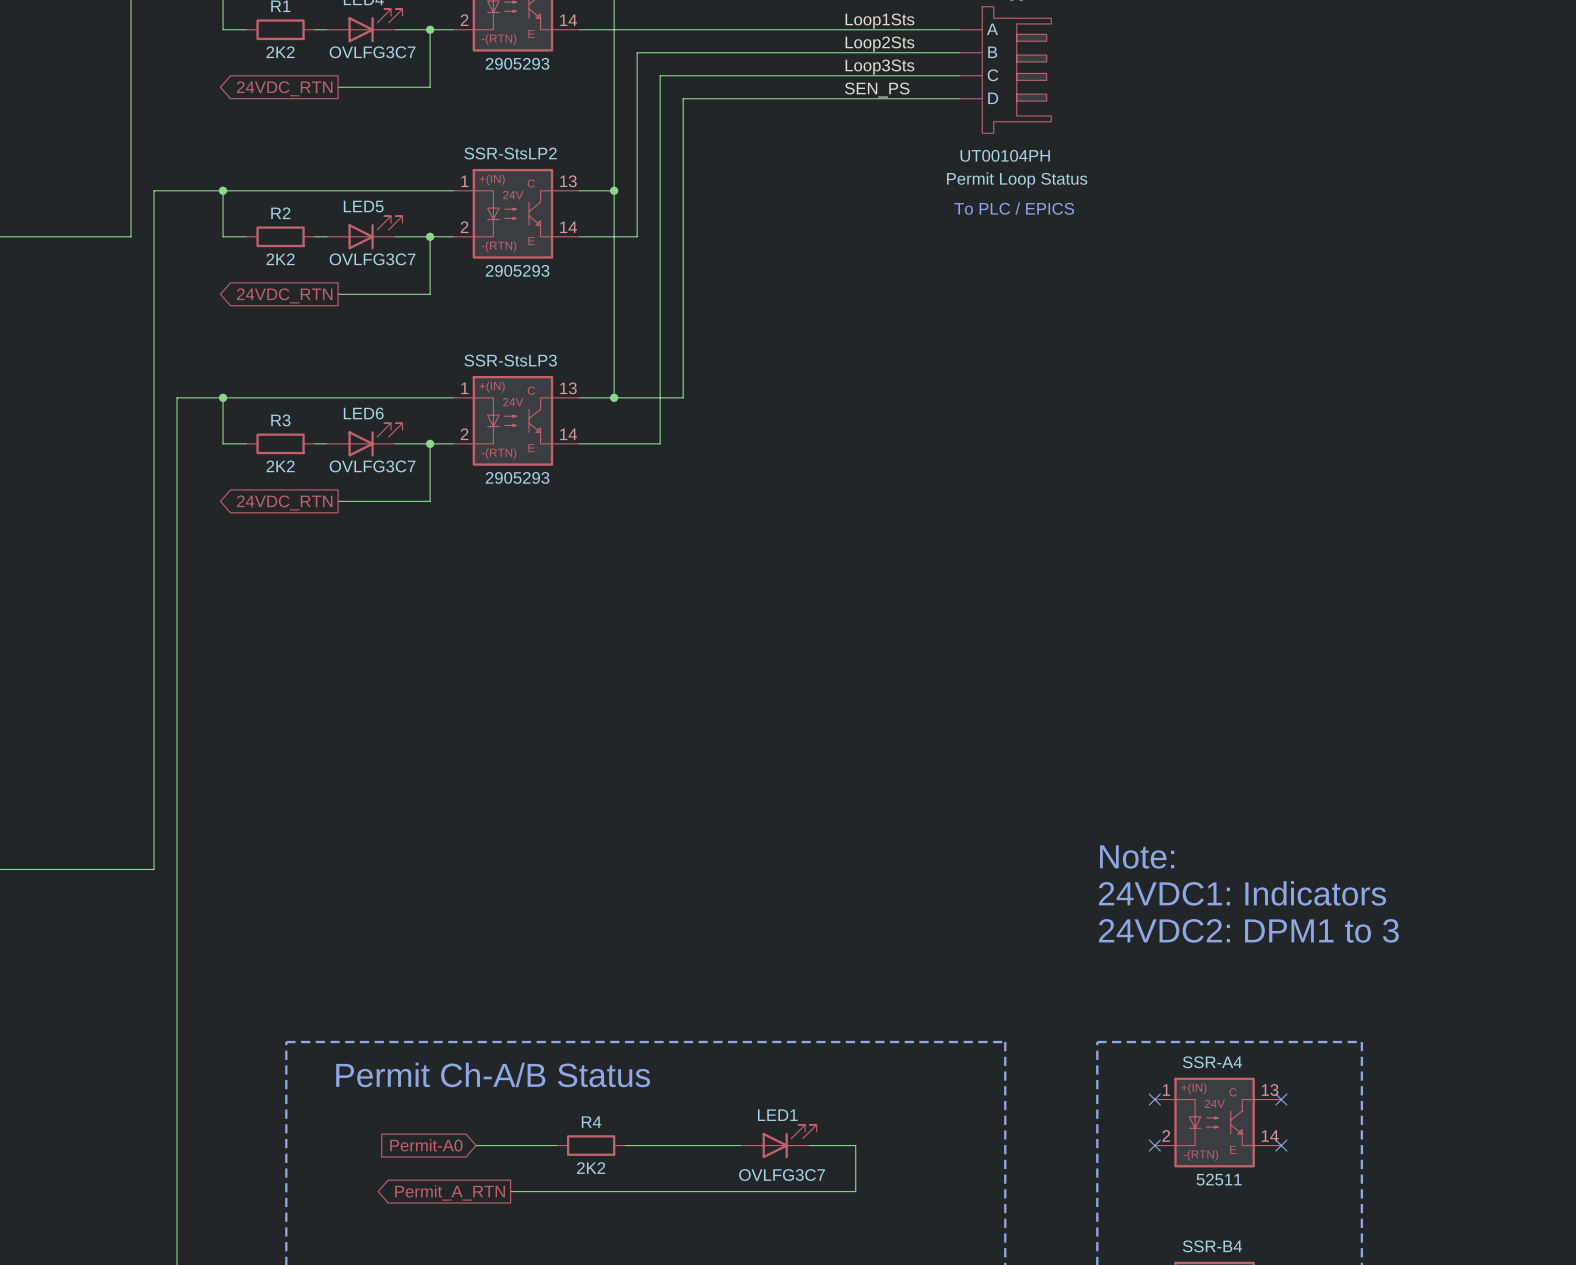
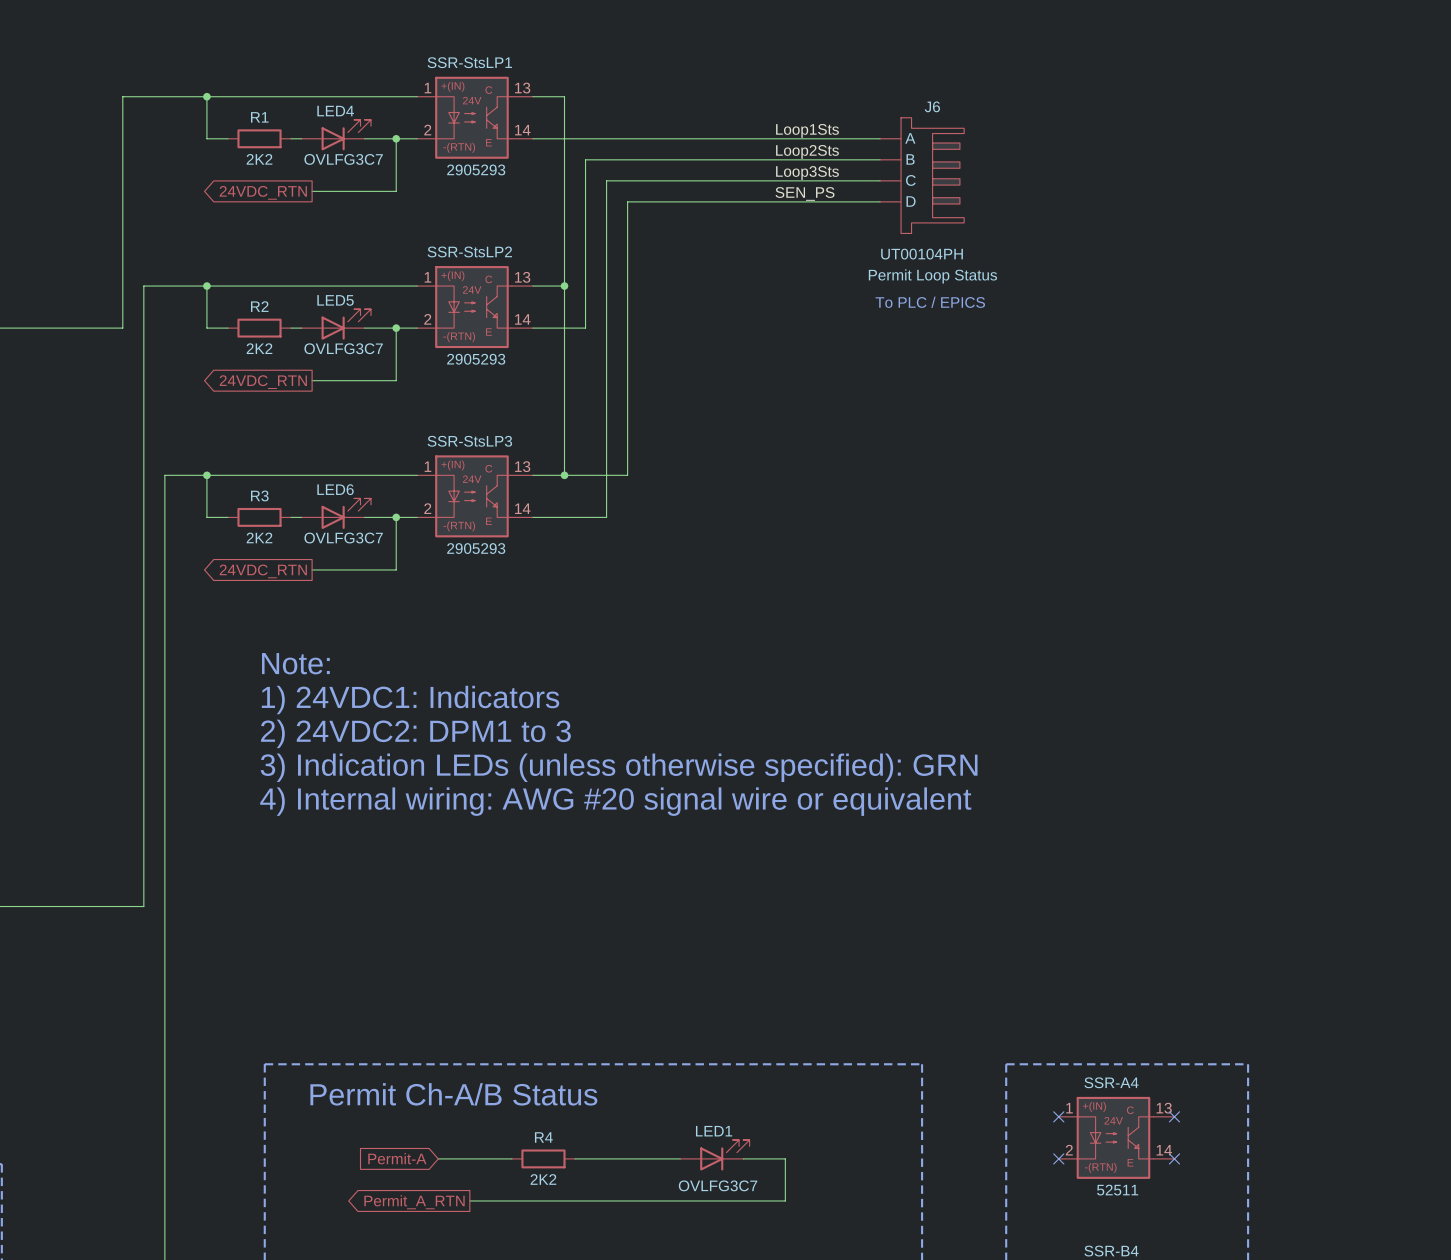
text: none -> Note: (295, 663)
text: none -> 1) 24VDC1: Indicators (410, 700)
text: none -> 2) 24VDC2: DPM1 to 3 (415, 733)
text: none -> 3) Indication LEDs (unless otherwise specified): GRN (619, 767)
text: none -> 4) Internal wiring: AWG #20 signal wire or equivalent (615, 801)
text: Note: (1137, 856) -> none
text: 24VDC1: Indicators (1242, 893) -> none
text: 24VDC2: DPM1 to 3 (1248, 930) -> none
global label: Permit-A0 (426, 1145) -> Permit-A (397, 1158)

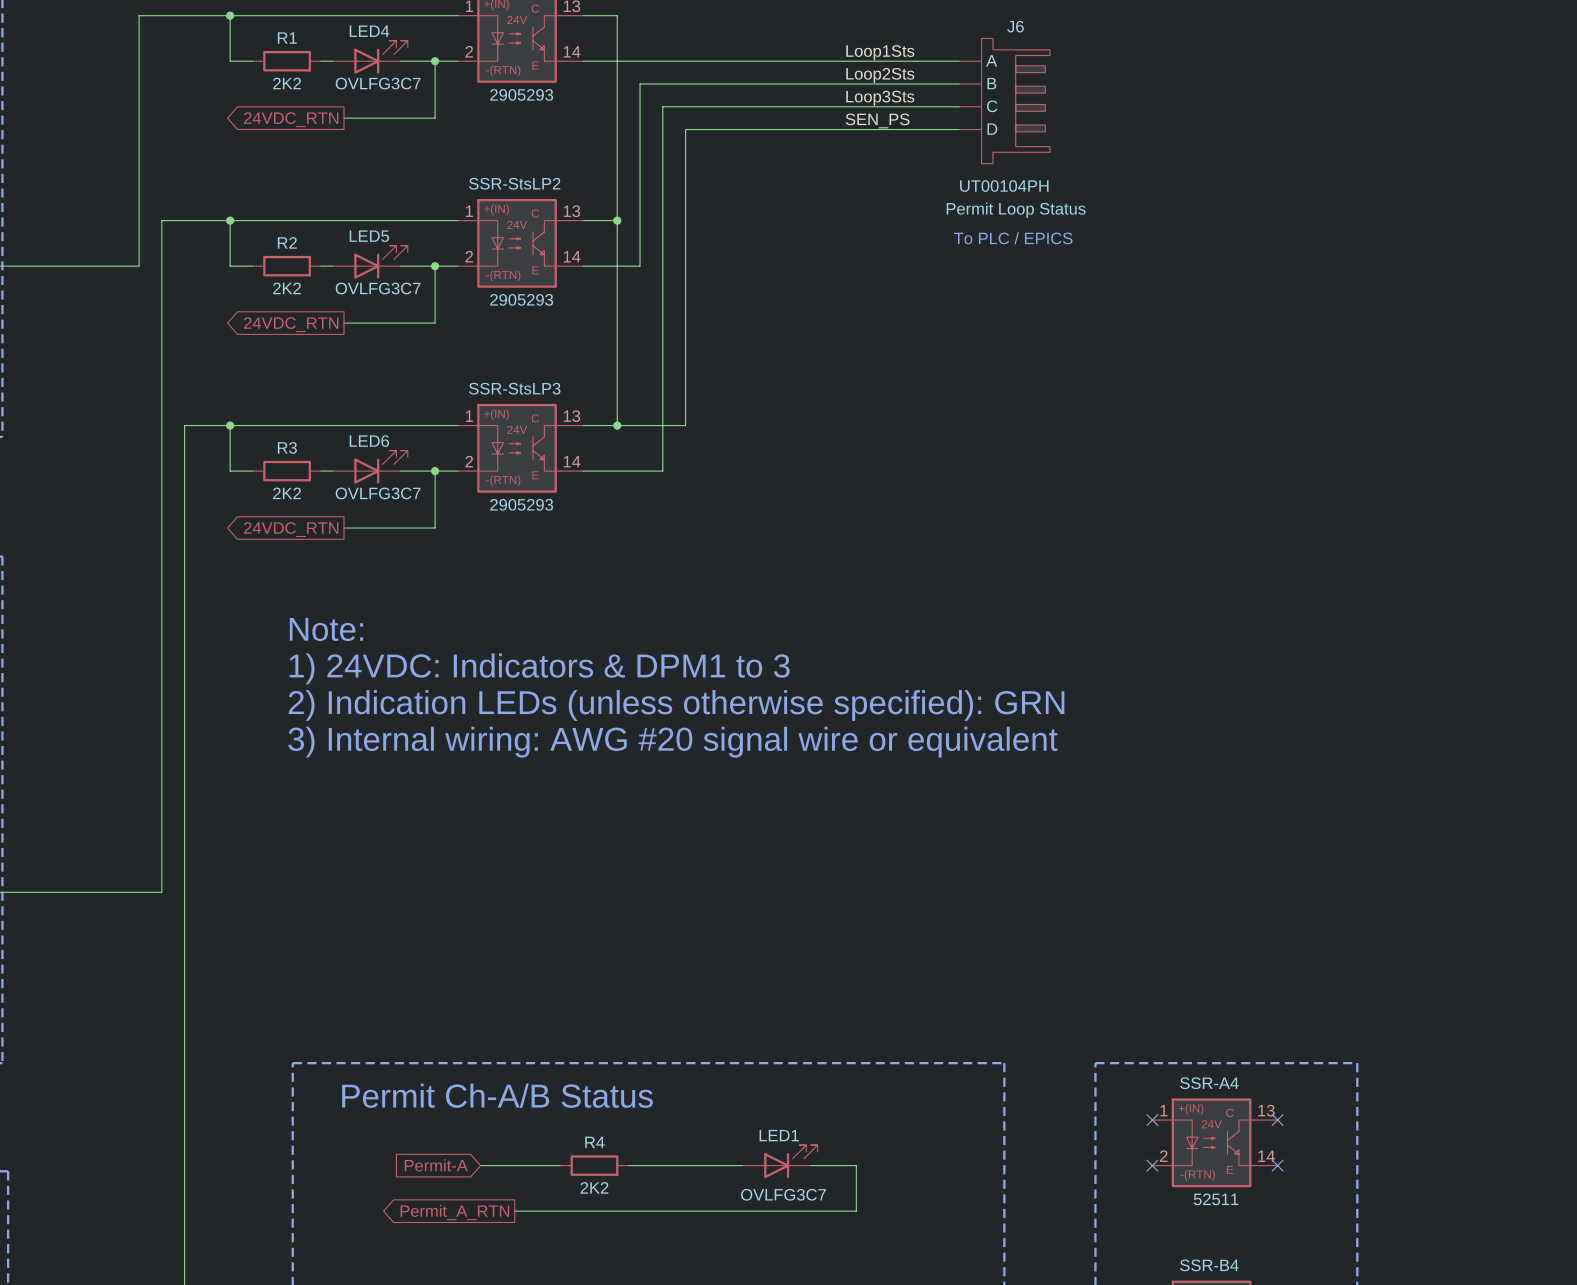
text: 1) 24VDC1: Indicators (410, 700) -> 1) 24VDC: Indicators & DPM1 to 3 (539, 668)
text: 2) 24VDC2: DPM1 to 3 (415, 733) -> 2) Indication LEDs (unless otherwise specified): GRN (676, 705)
text: 3) Indication LEDs (unless otherwise specified): GRN (619, 767) -> 3) Internal wiring: AWG #20 signal wire or equivalent (672, 742)
text: 4) Internal wiring: AWG #20 signal wire or equivalent (615, 801) -> none

